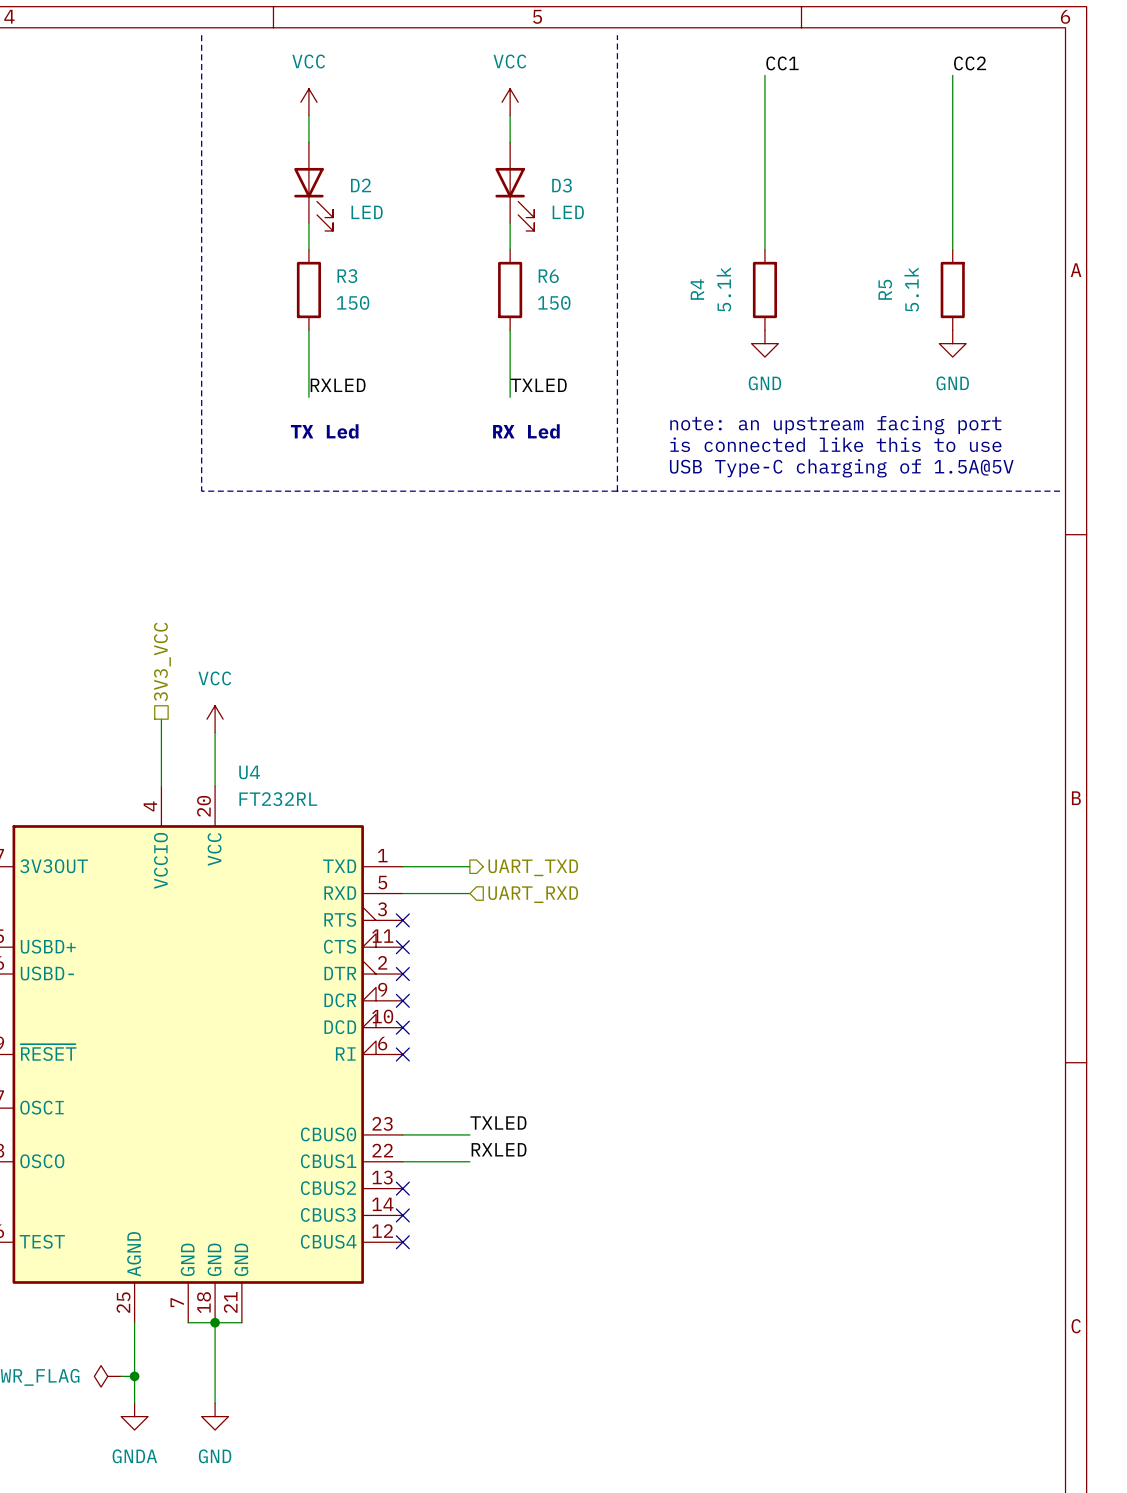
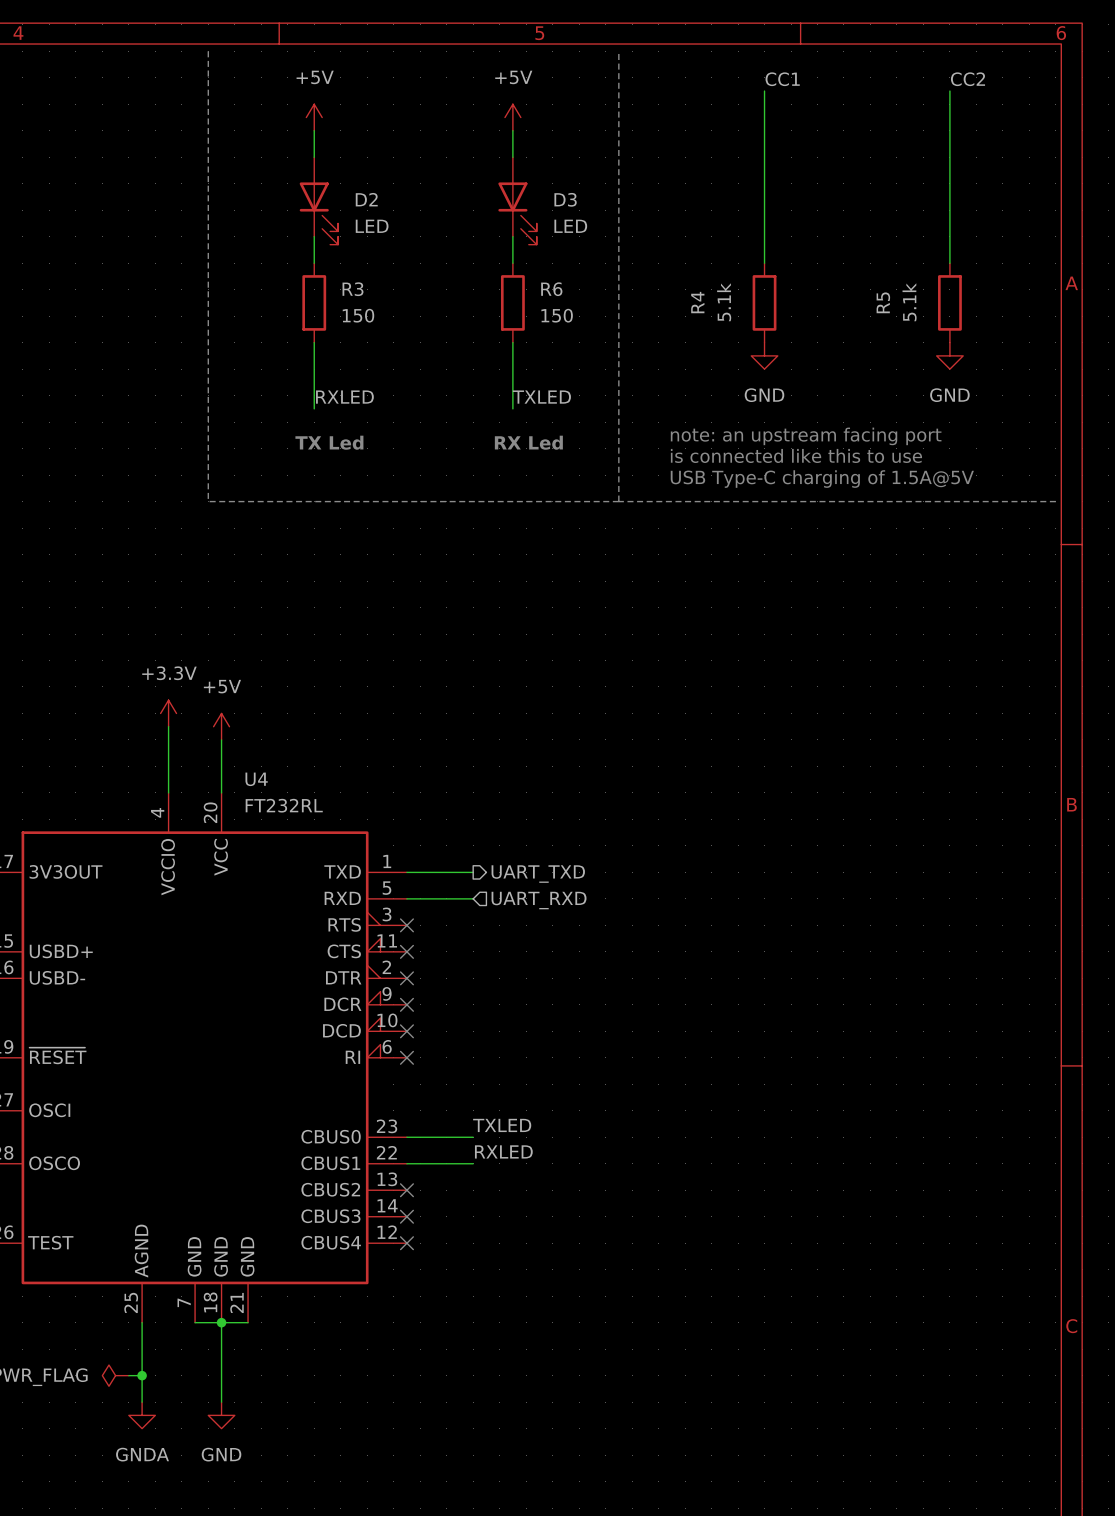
power symbol: VCC (308, 102) -> +5V (314, 117)
power symbol: VCC (510, 102) -> +5V (512, 117)
hierarchical label: 3V3_VCC (162, 661) -> none
power symbol: none -> +3.3V (168, 713)
power symbol: VCC (215, 719) -> +5V (221, 726)

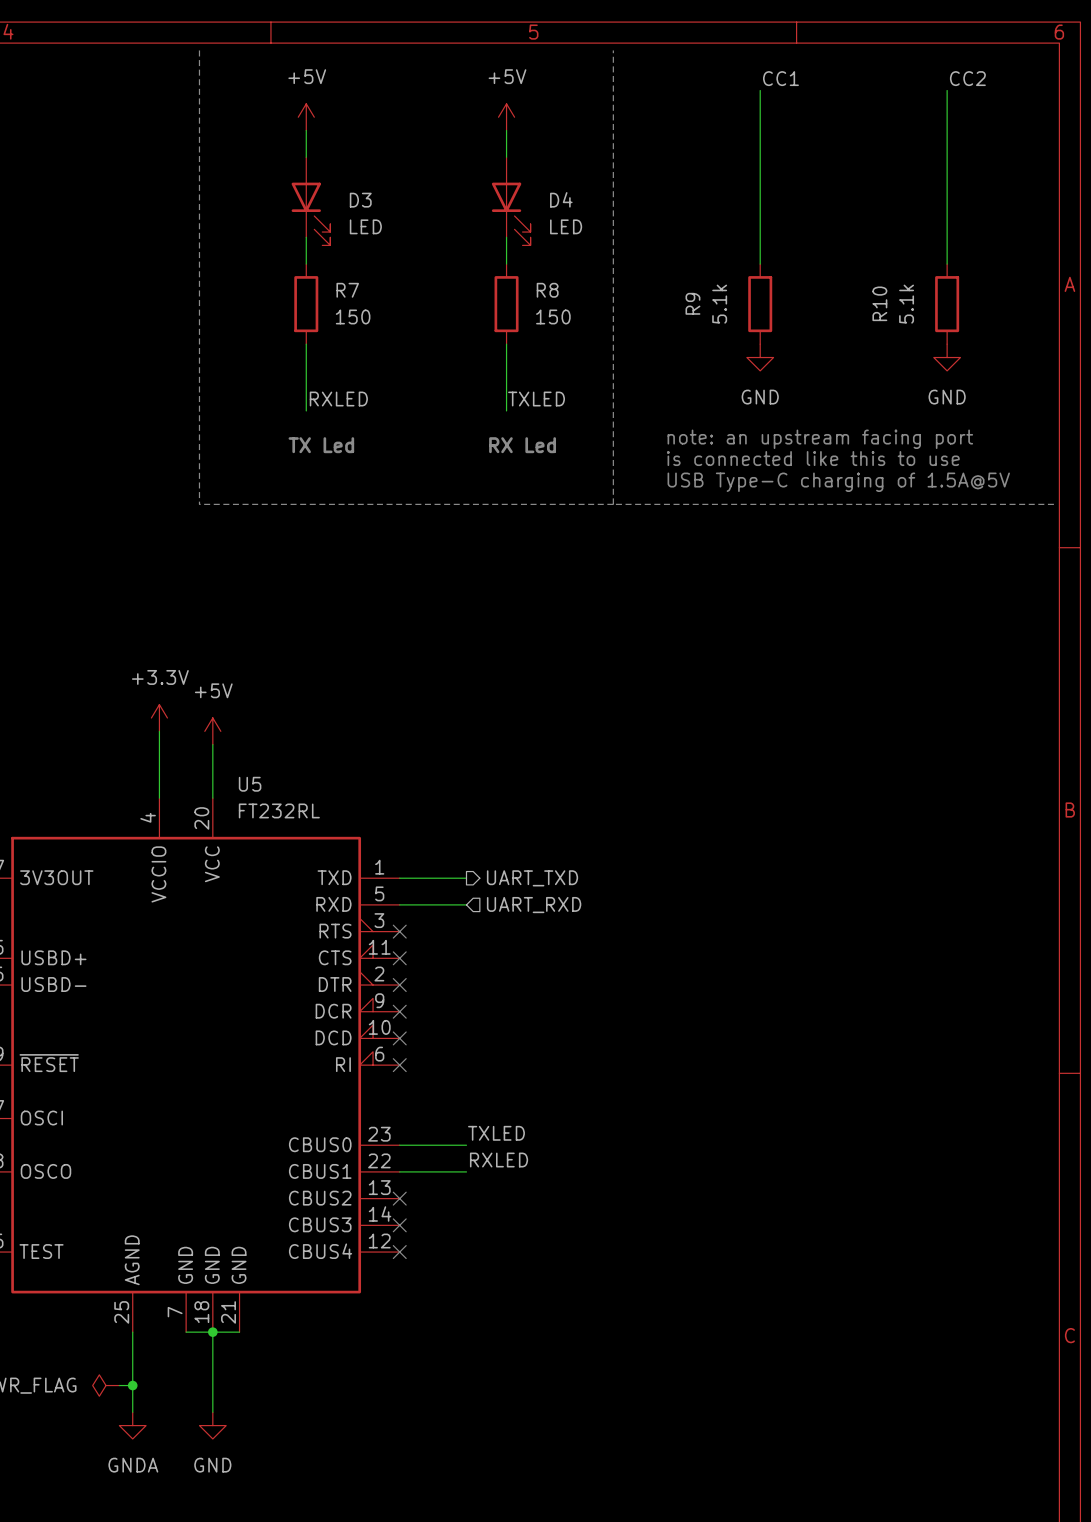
D2 name: D2 (366, 199) -> D3 (360, 200)
D3 name: D3 (565, 199) -> D4 (561, 199)
R3 name: R3 (352, 289) -> R7 (347, 290)
R6 name: R6 (551, 289) -> R8 (547, 290)
R4 name: R4 (697, 302) -> R9 (692, 303)
R5 name: R5 (883, 302) -> R10 (879, 303)
U4 name: U4 (256, 779) -> U5 (250, 784)

